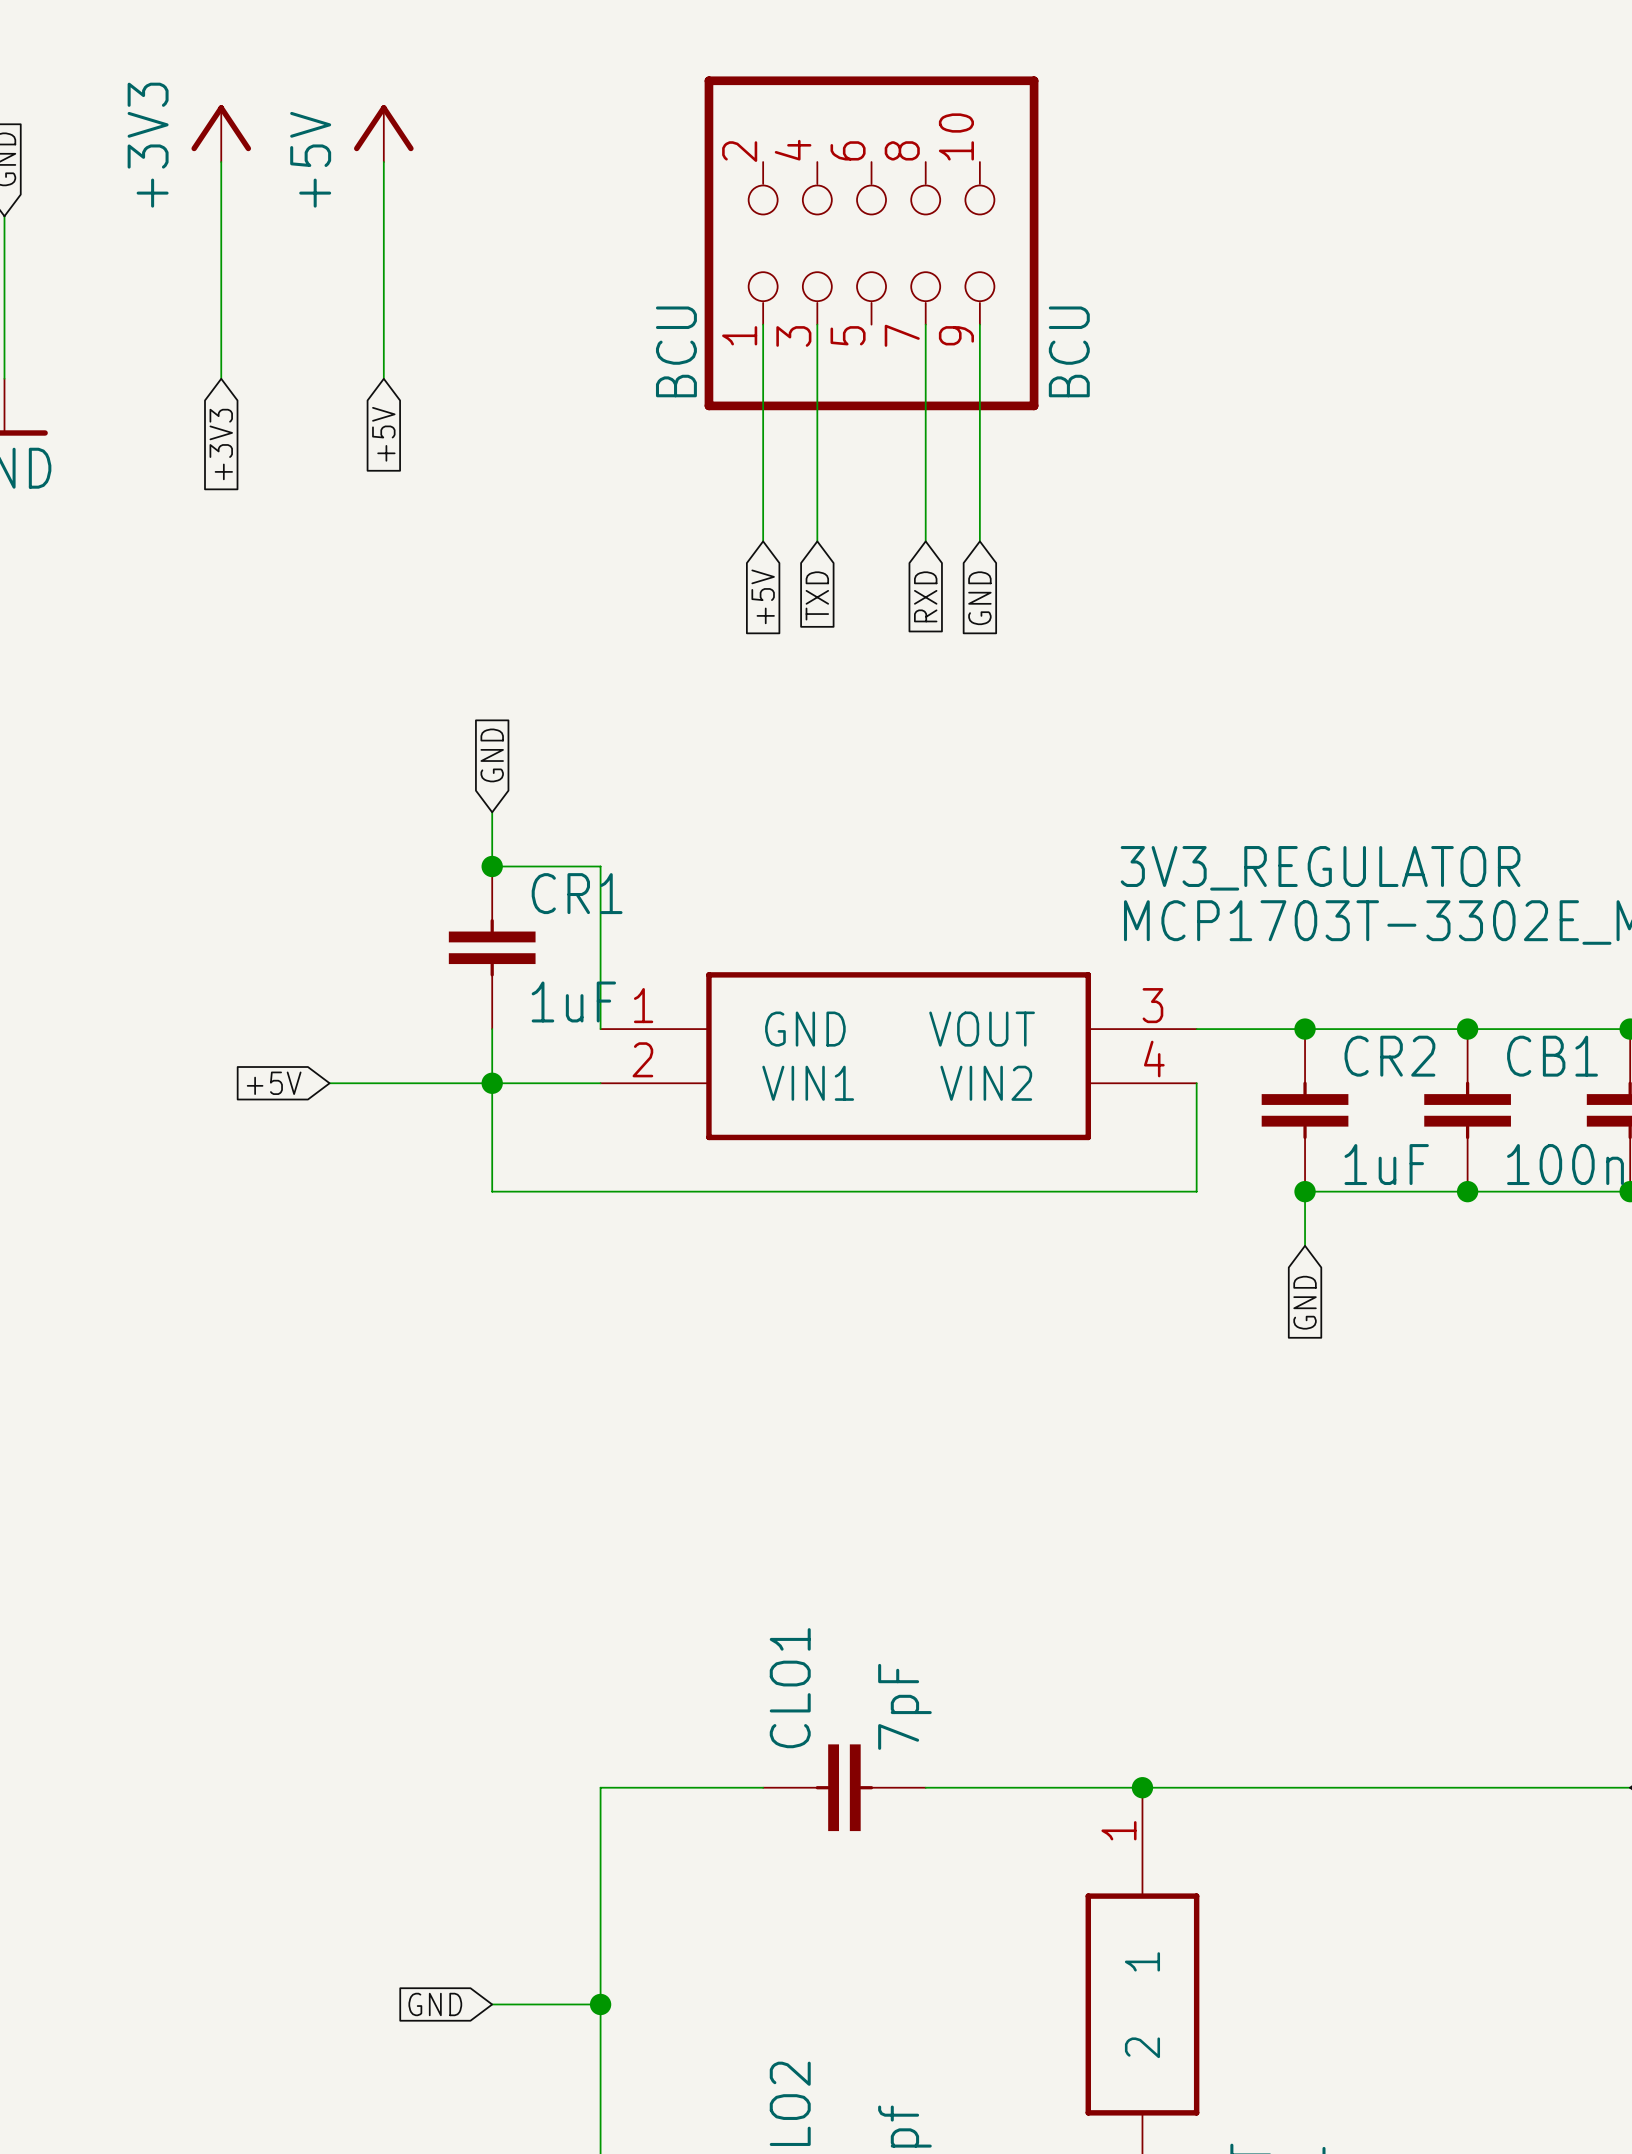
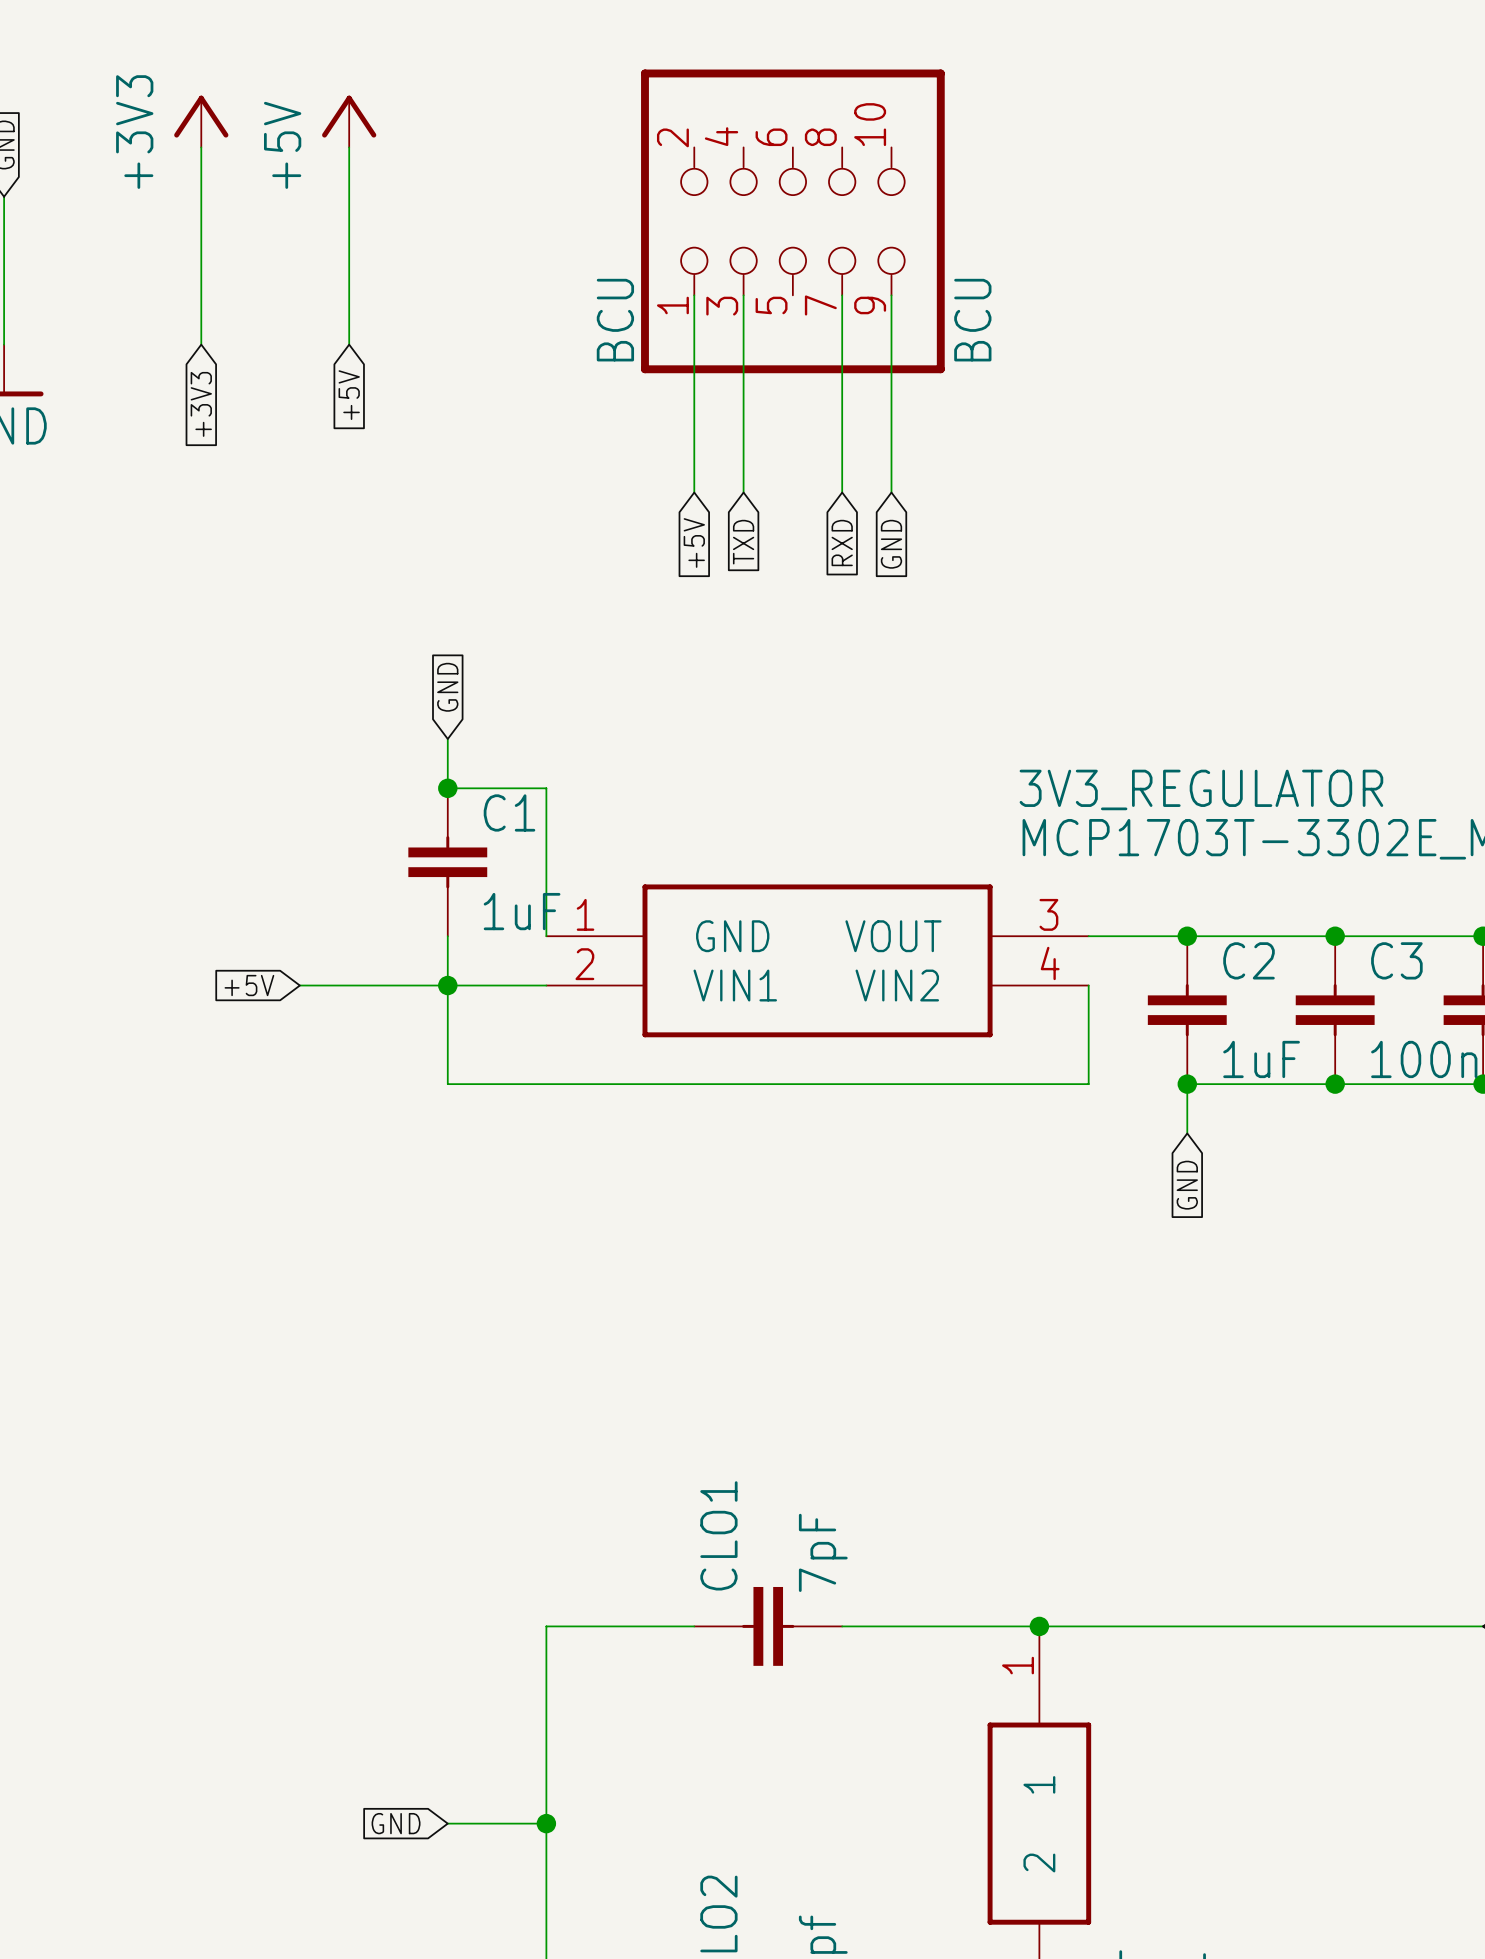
CR1 name: CR1 (577, 893) -> C1 (509, 812)
CR2 name: CR2 (1389, 1056) -> C2 (1249, 960)
CB1 name: CB1 (1552, 1056) -> C3 (1396, 960)

